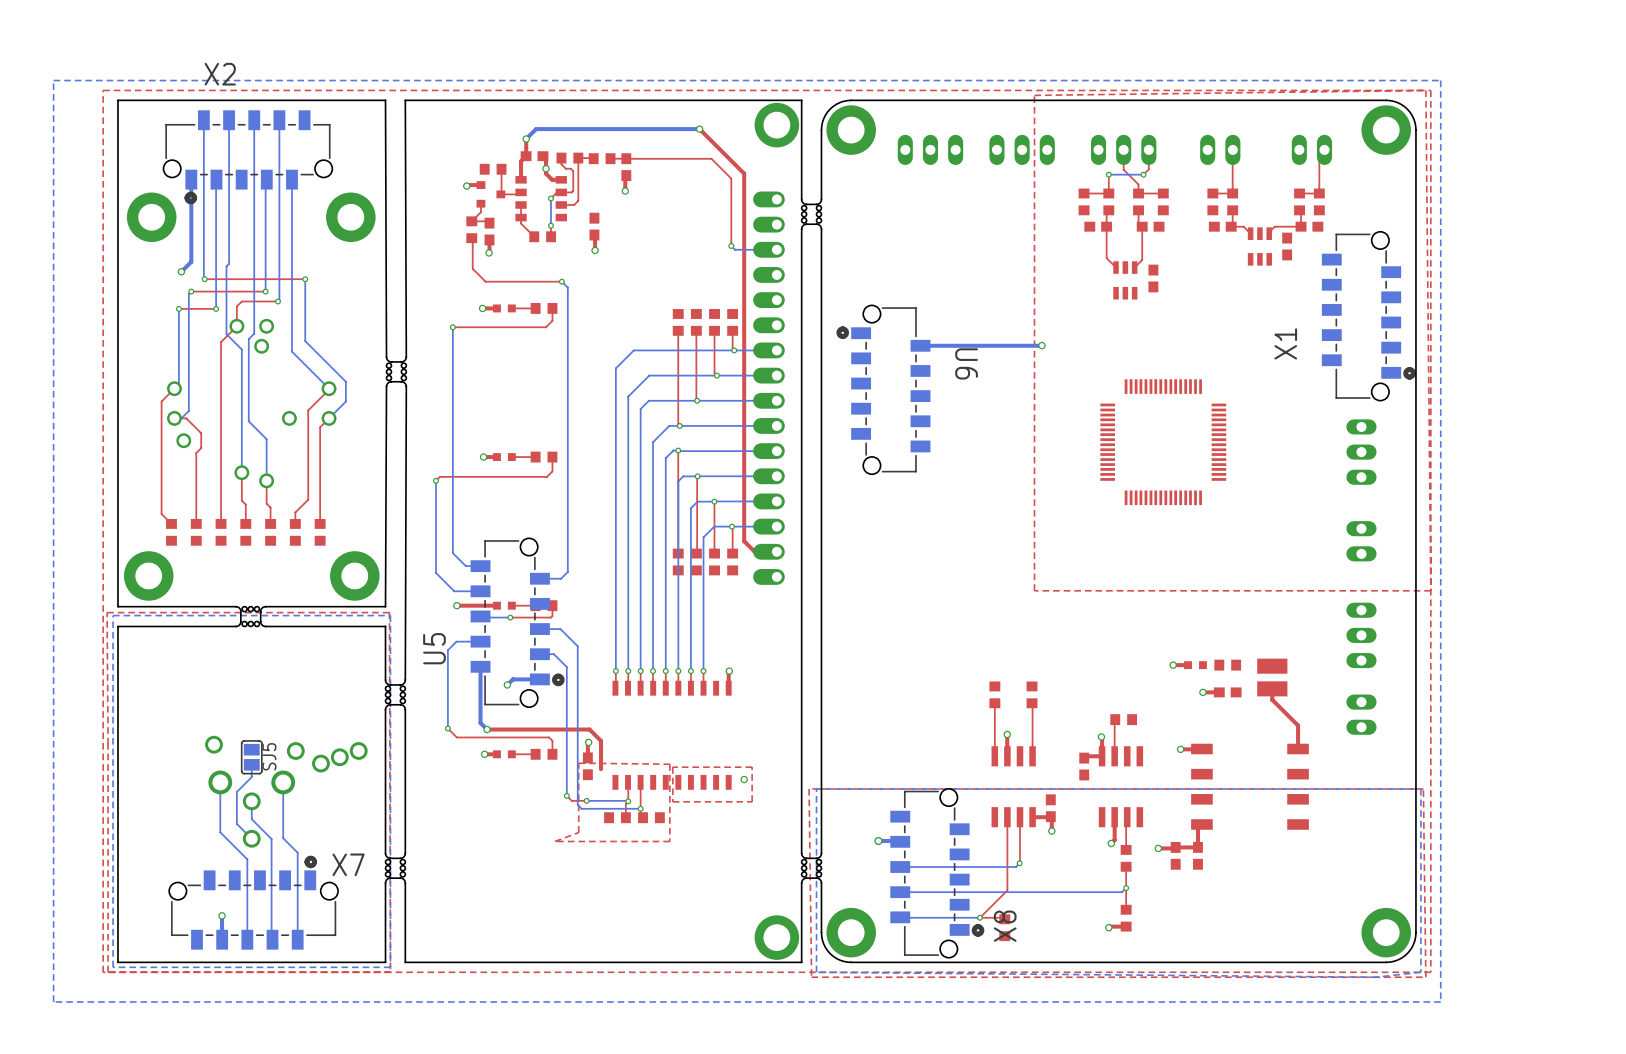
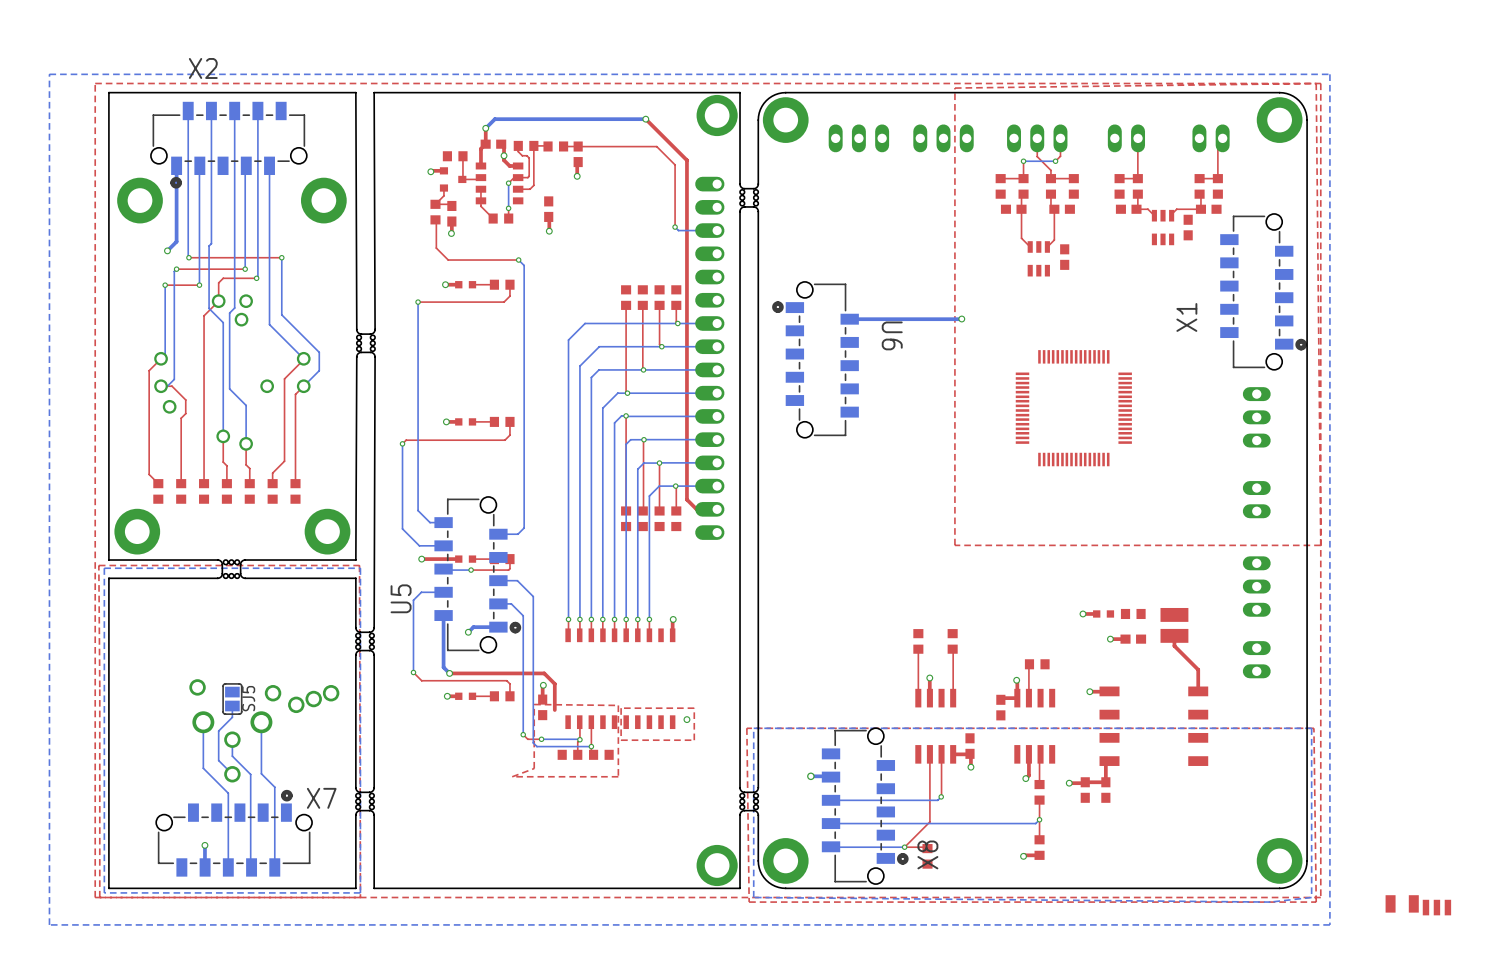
part: none -> (1402, 903)
part: none -> (1436, 907)

